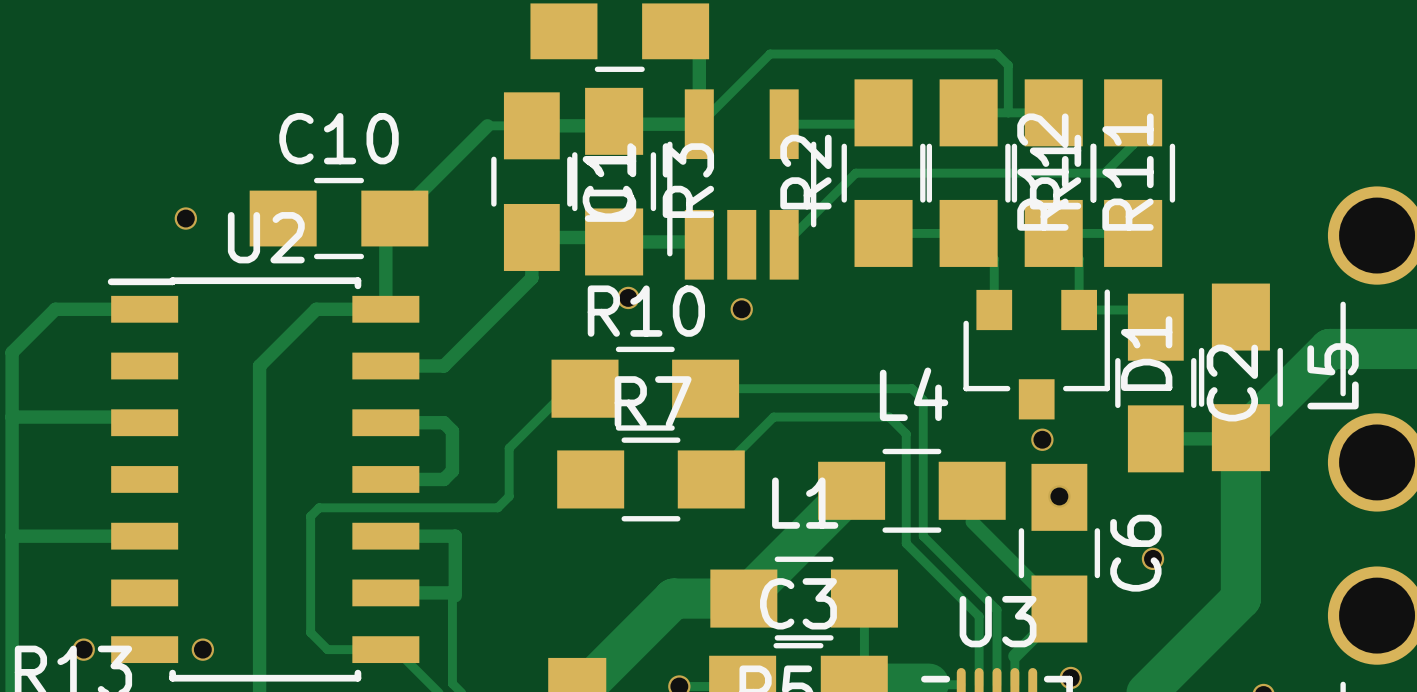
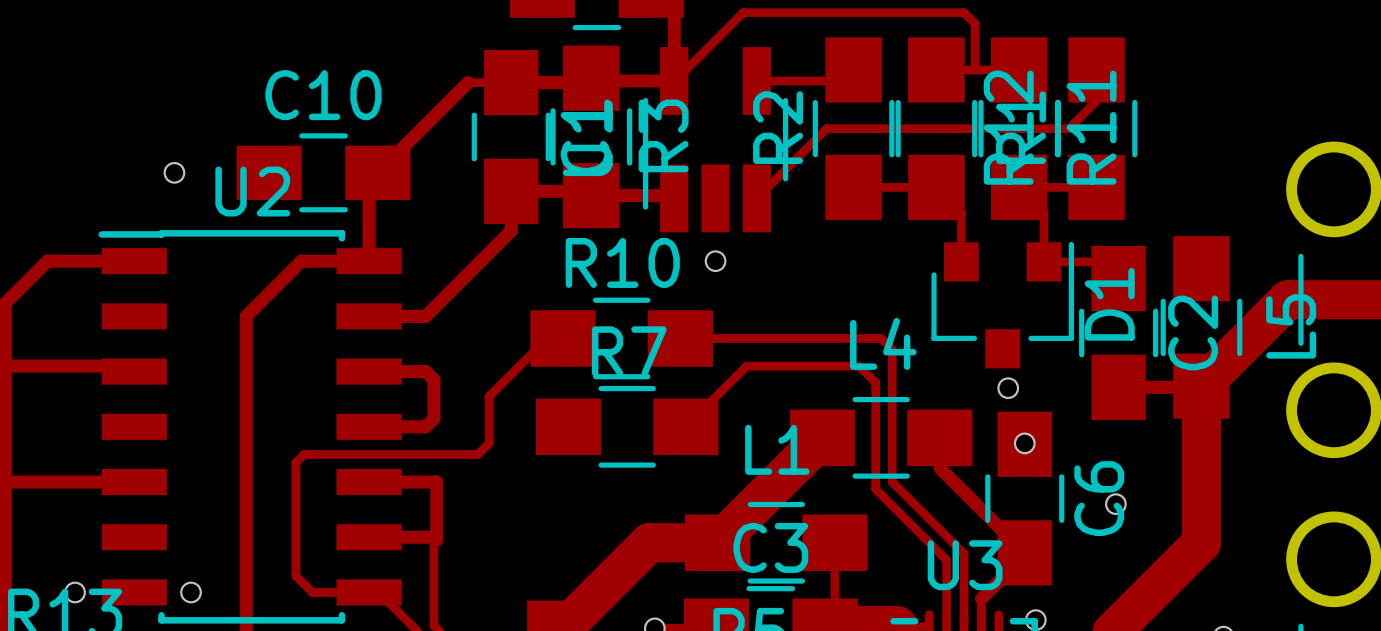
via: (628, 297) -> none

